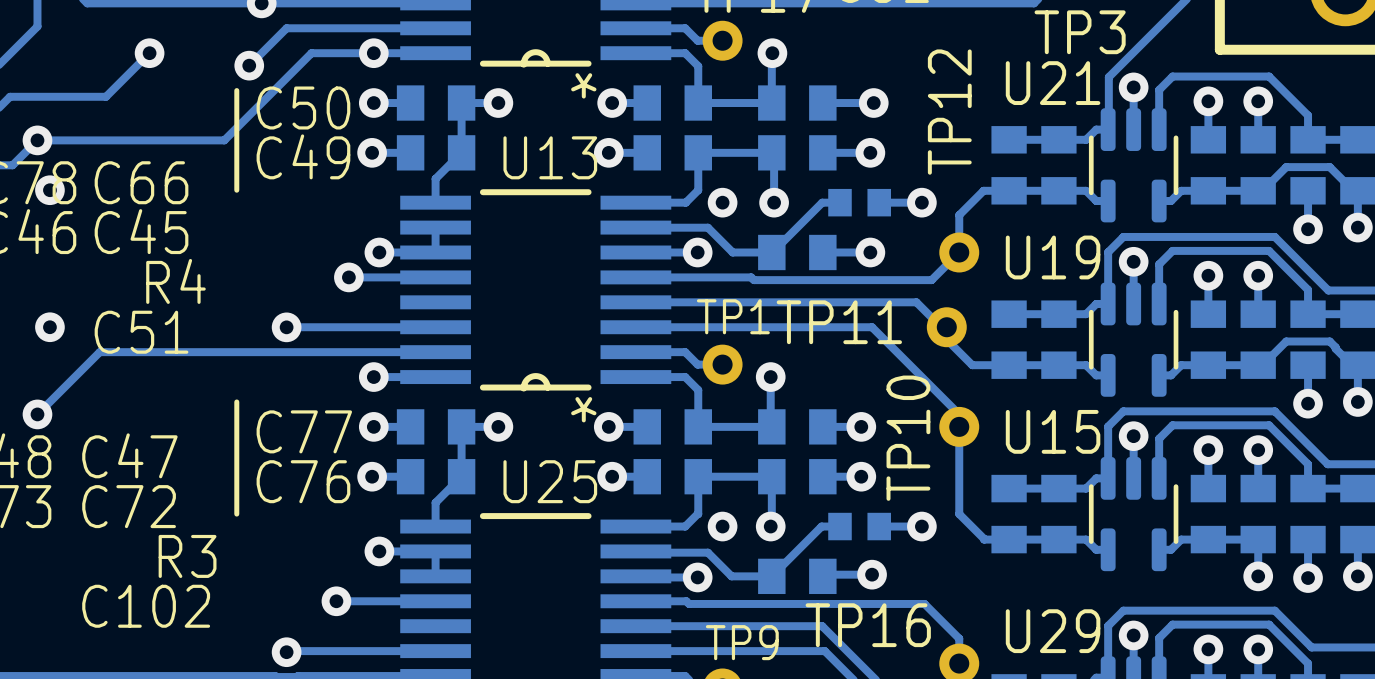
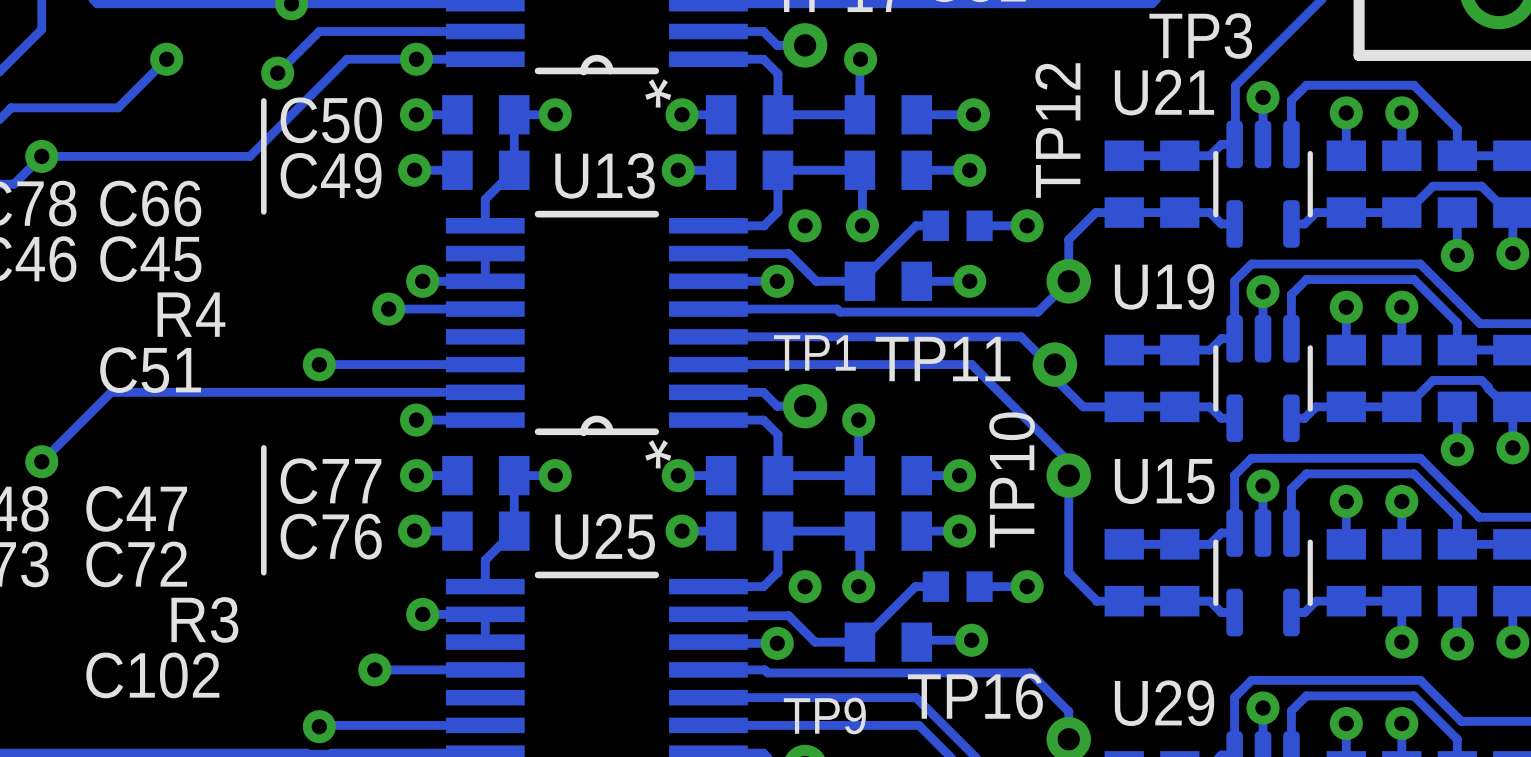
via: (49, 190) -> none
via: (49, 327) -> none

